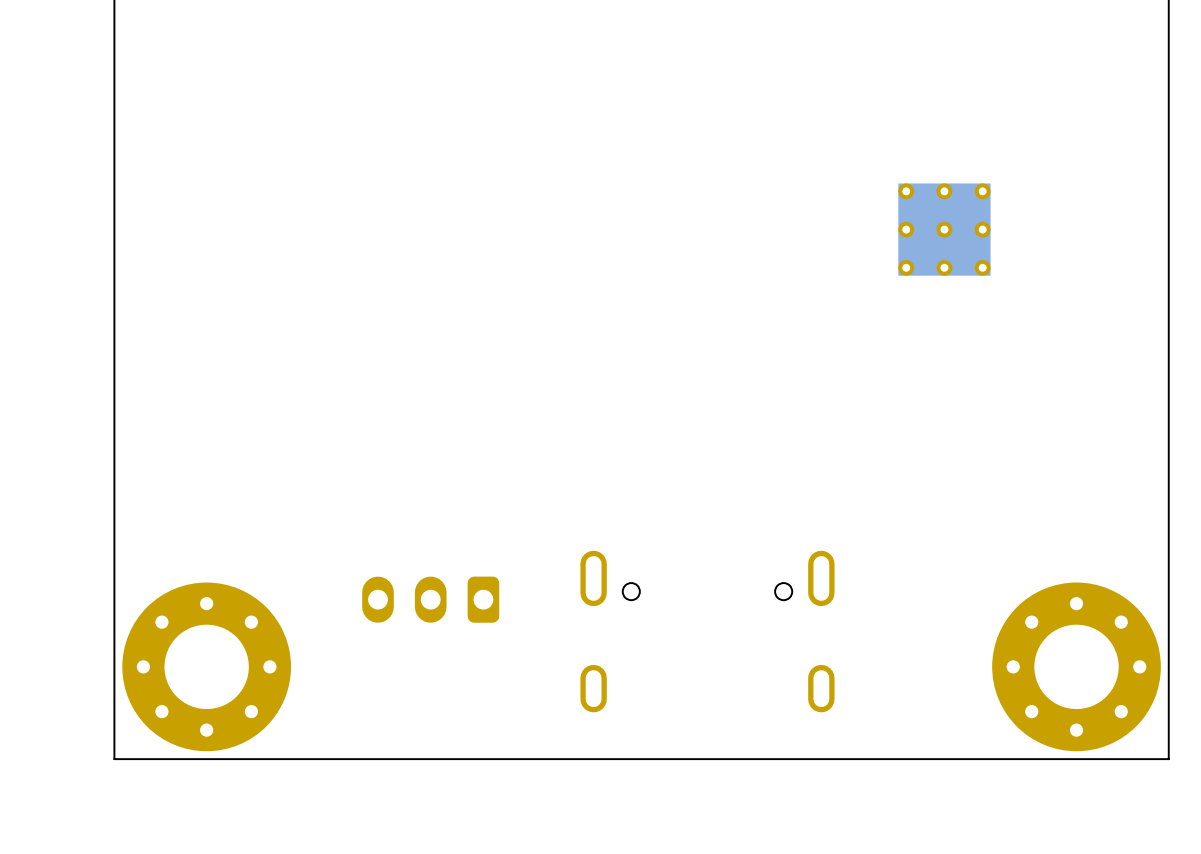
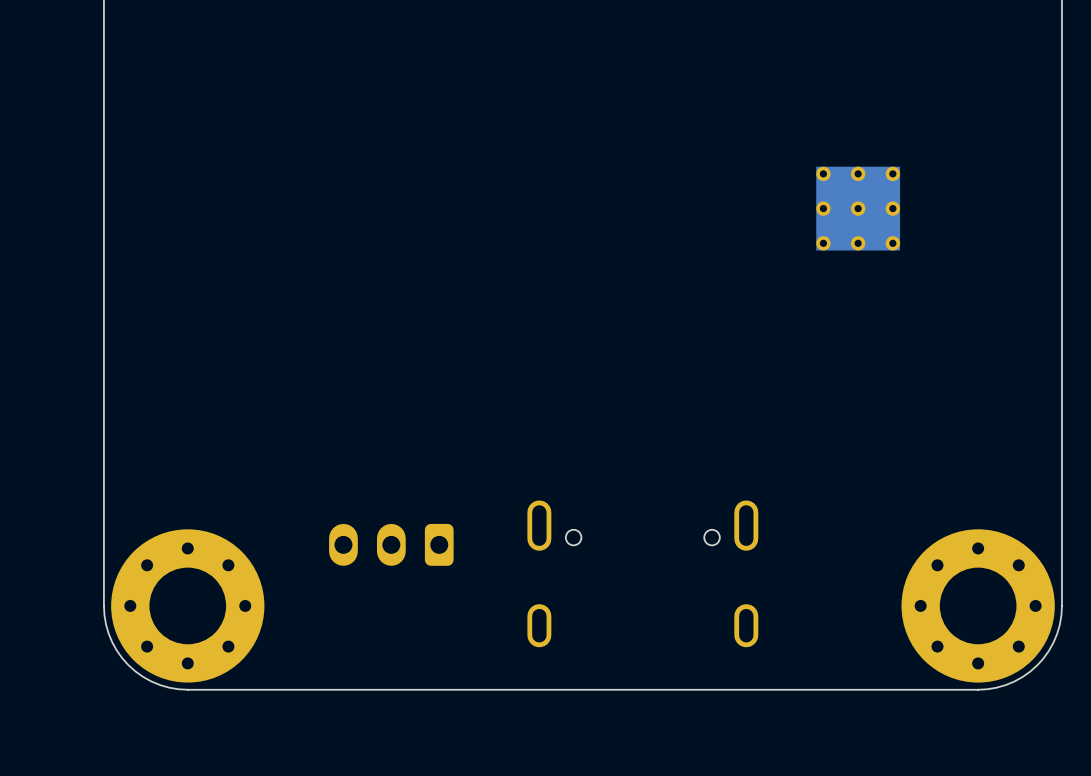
board edge: (114, 666) (114, 759) (206, 759) -> (103, 605) (108, 633) (116, 650) (128, 665) (143, 676) (160, 685) (187, 689)
board edge: (1168, 666) (1168, 759) (1076, 759) -> (1061, 605) (1059, 624) (1053, 642) (1037, 665) (1014, 681) (996, 687) (978, 689)

